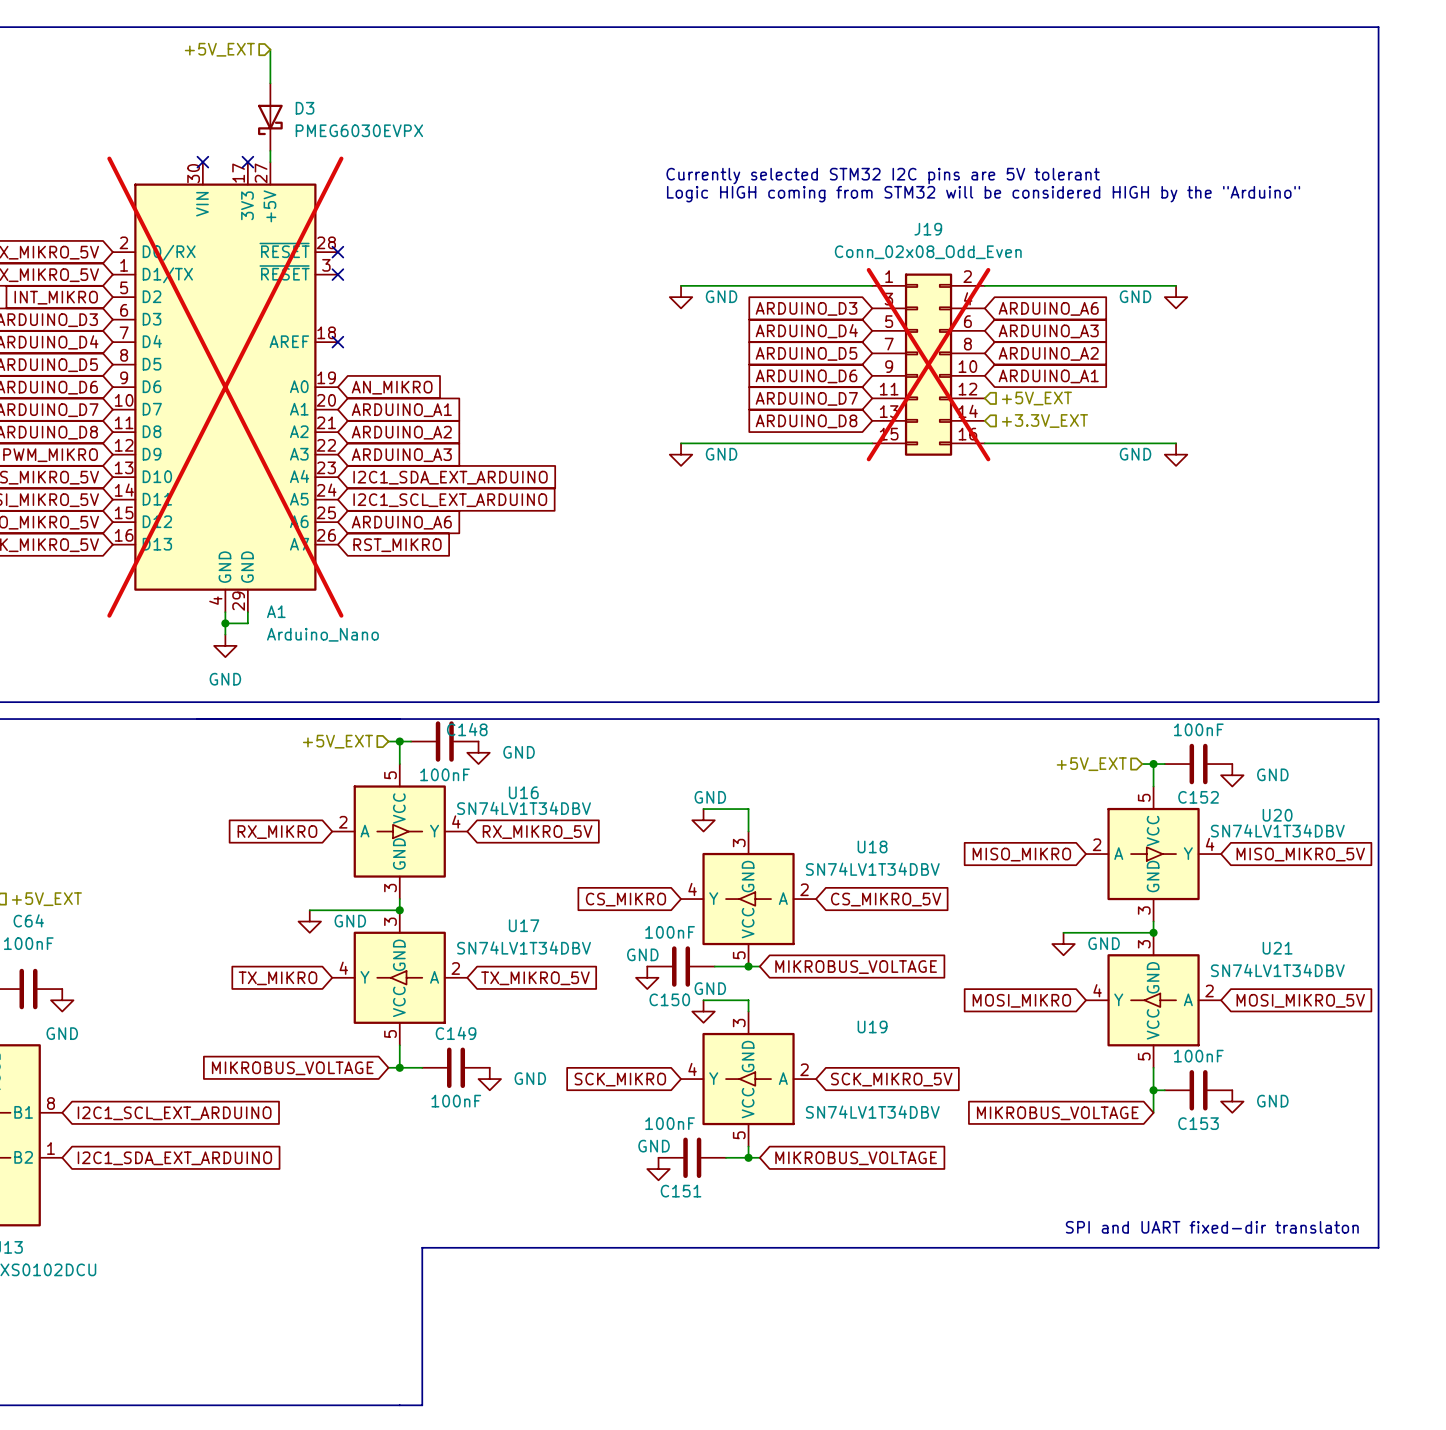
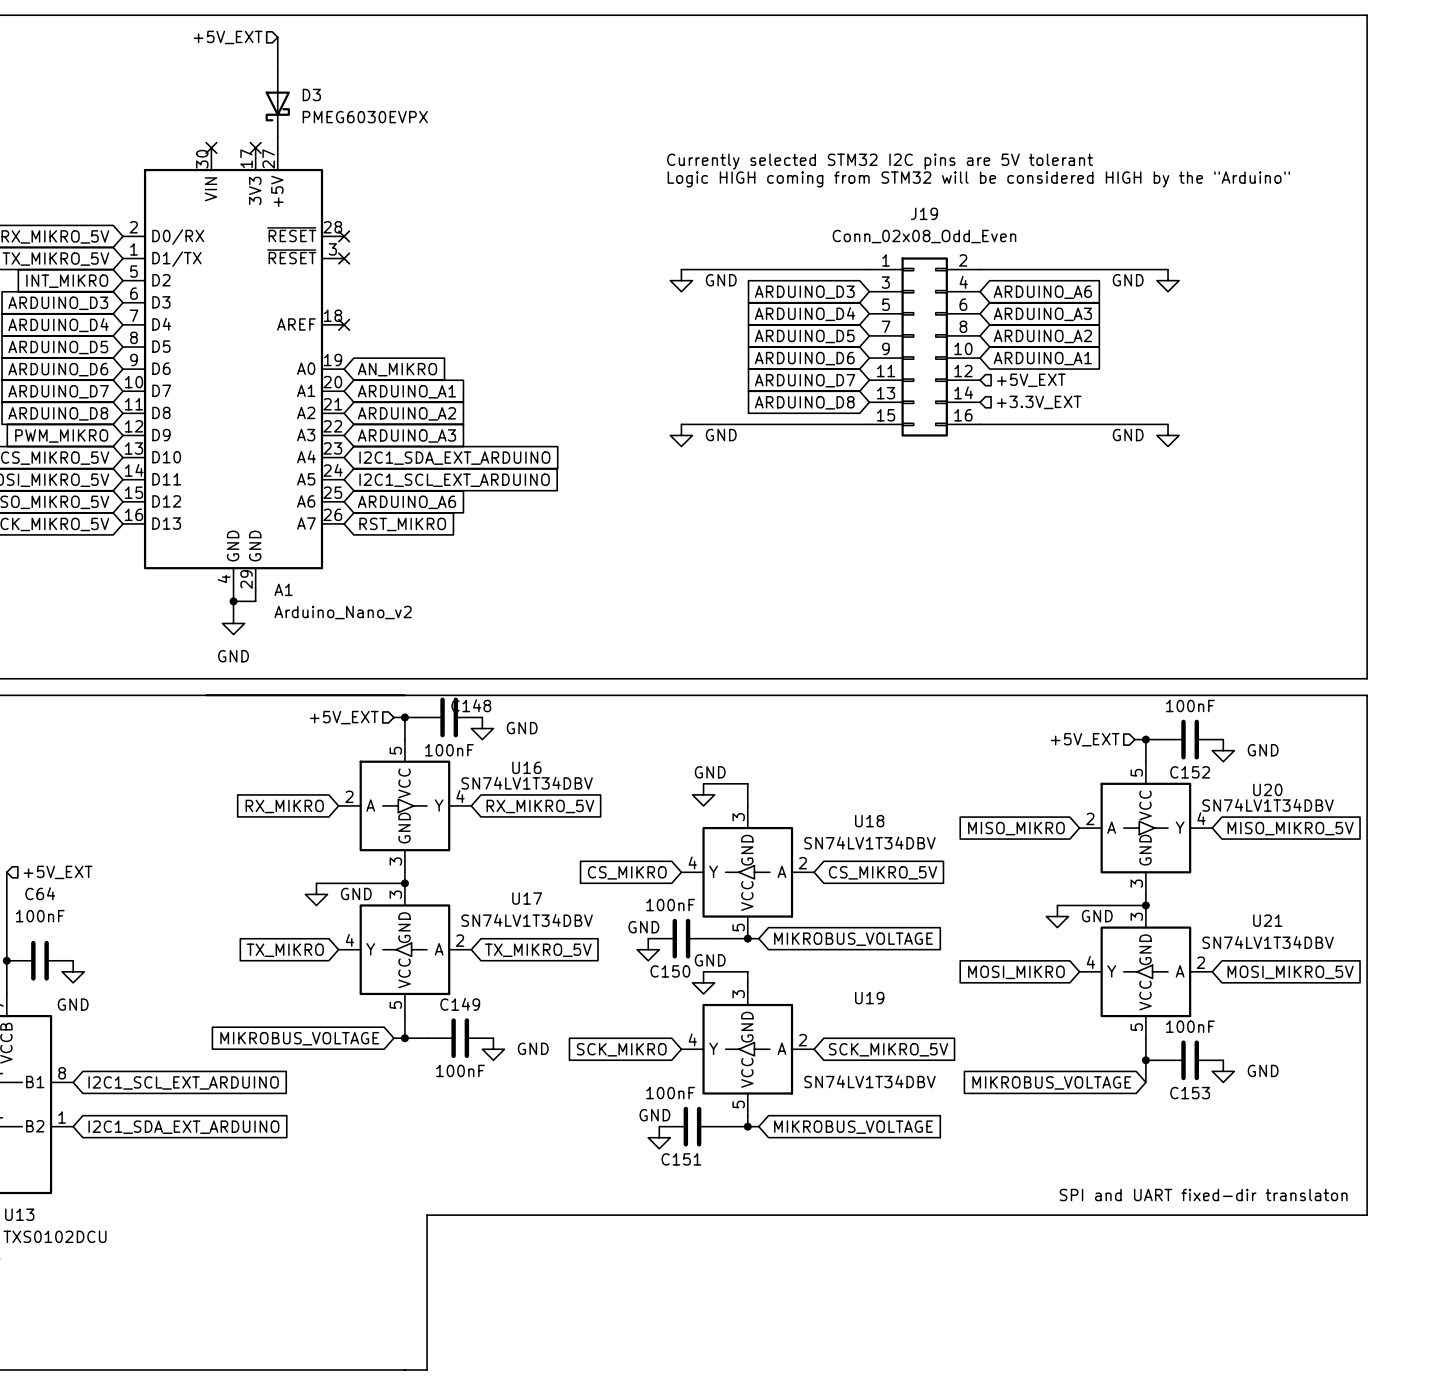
J19 do-not-place cross: (928, 364) -> none
A1 do-not-place cross: (225, 387) -> none
A1 value: Arduino_Nano (322, 634) -> Arduino_Nano_v2 (343, 612)

